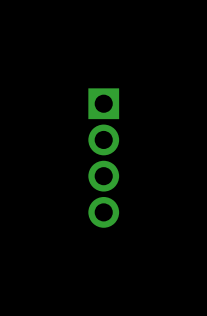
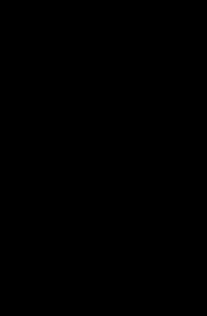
part: (103, 158) -> none

